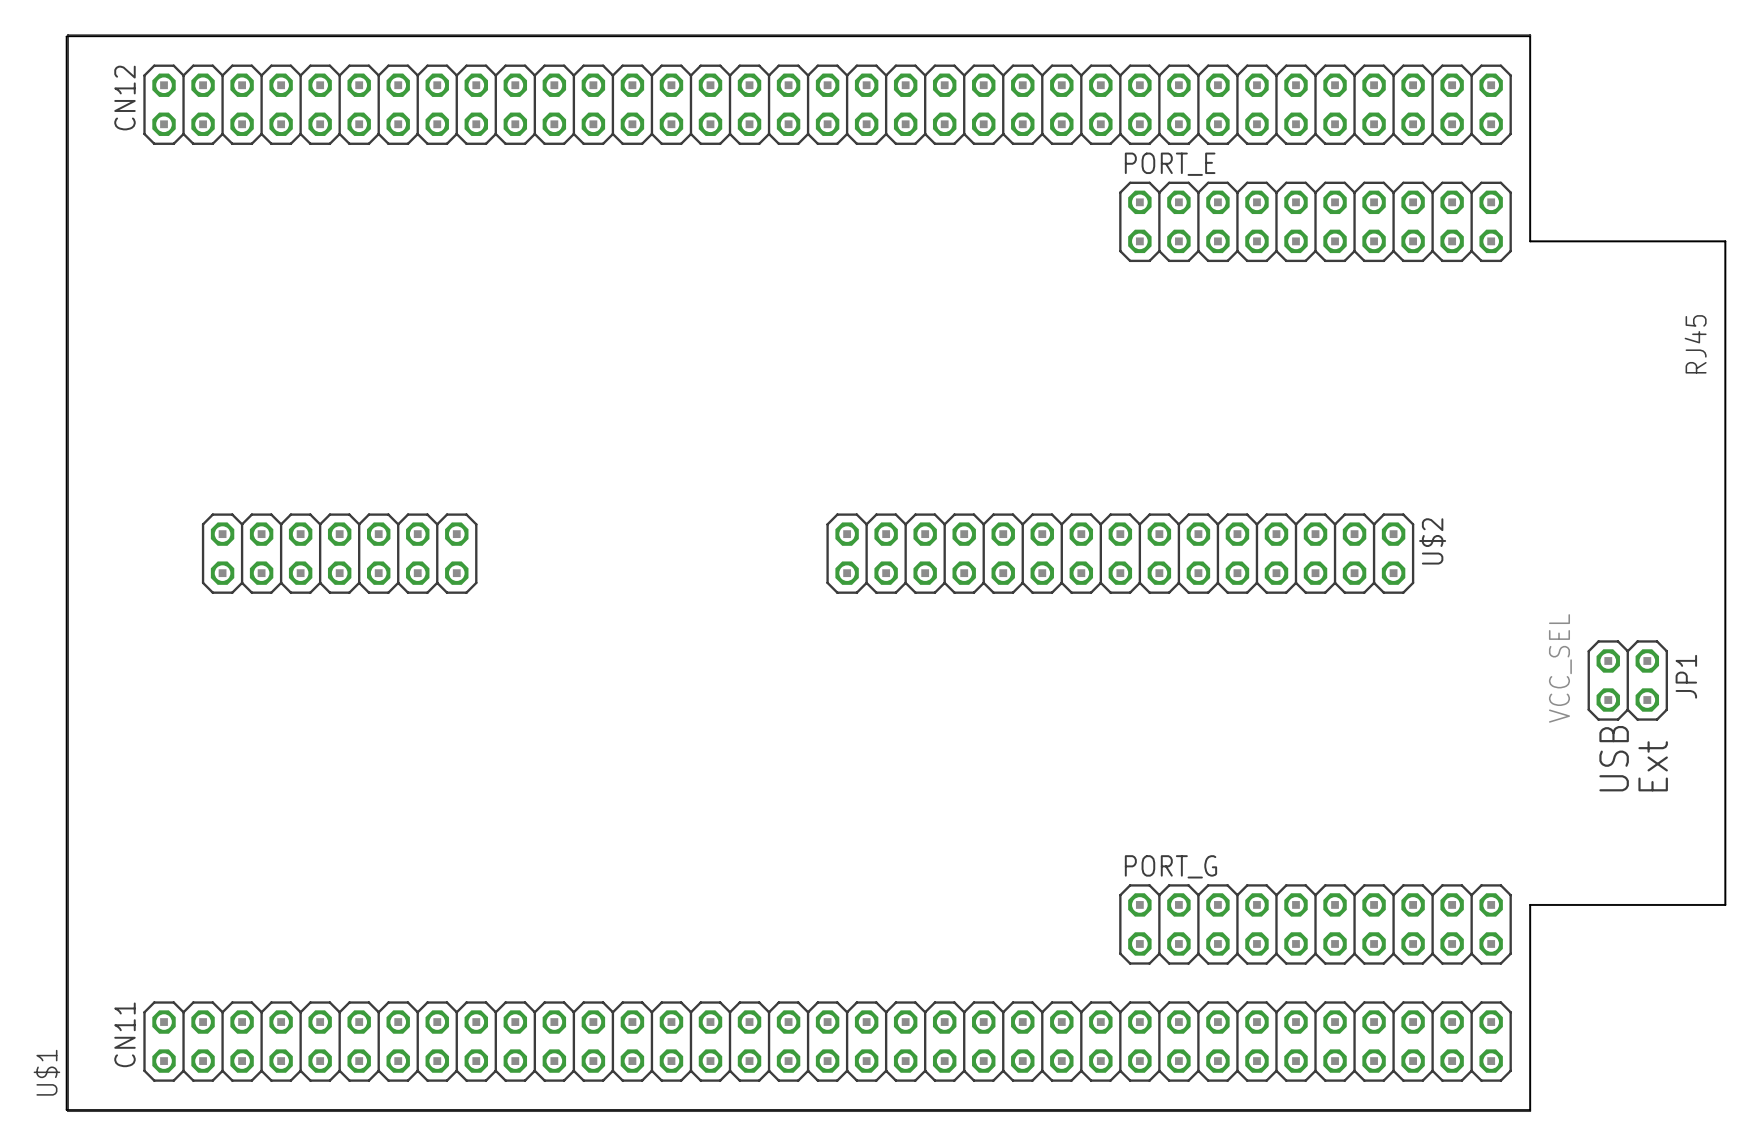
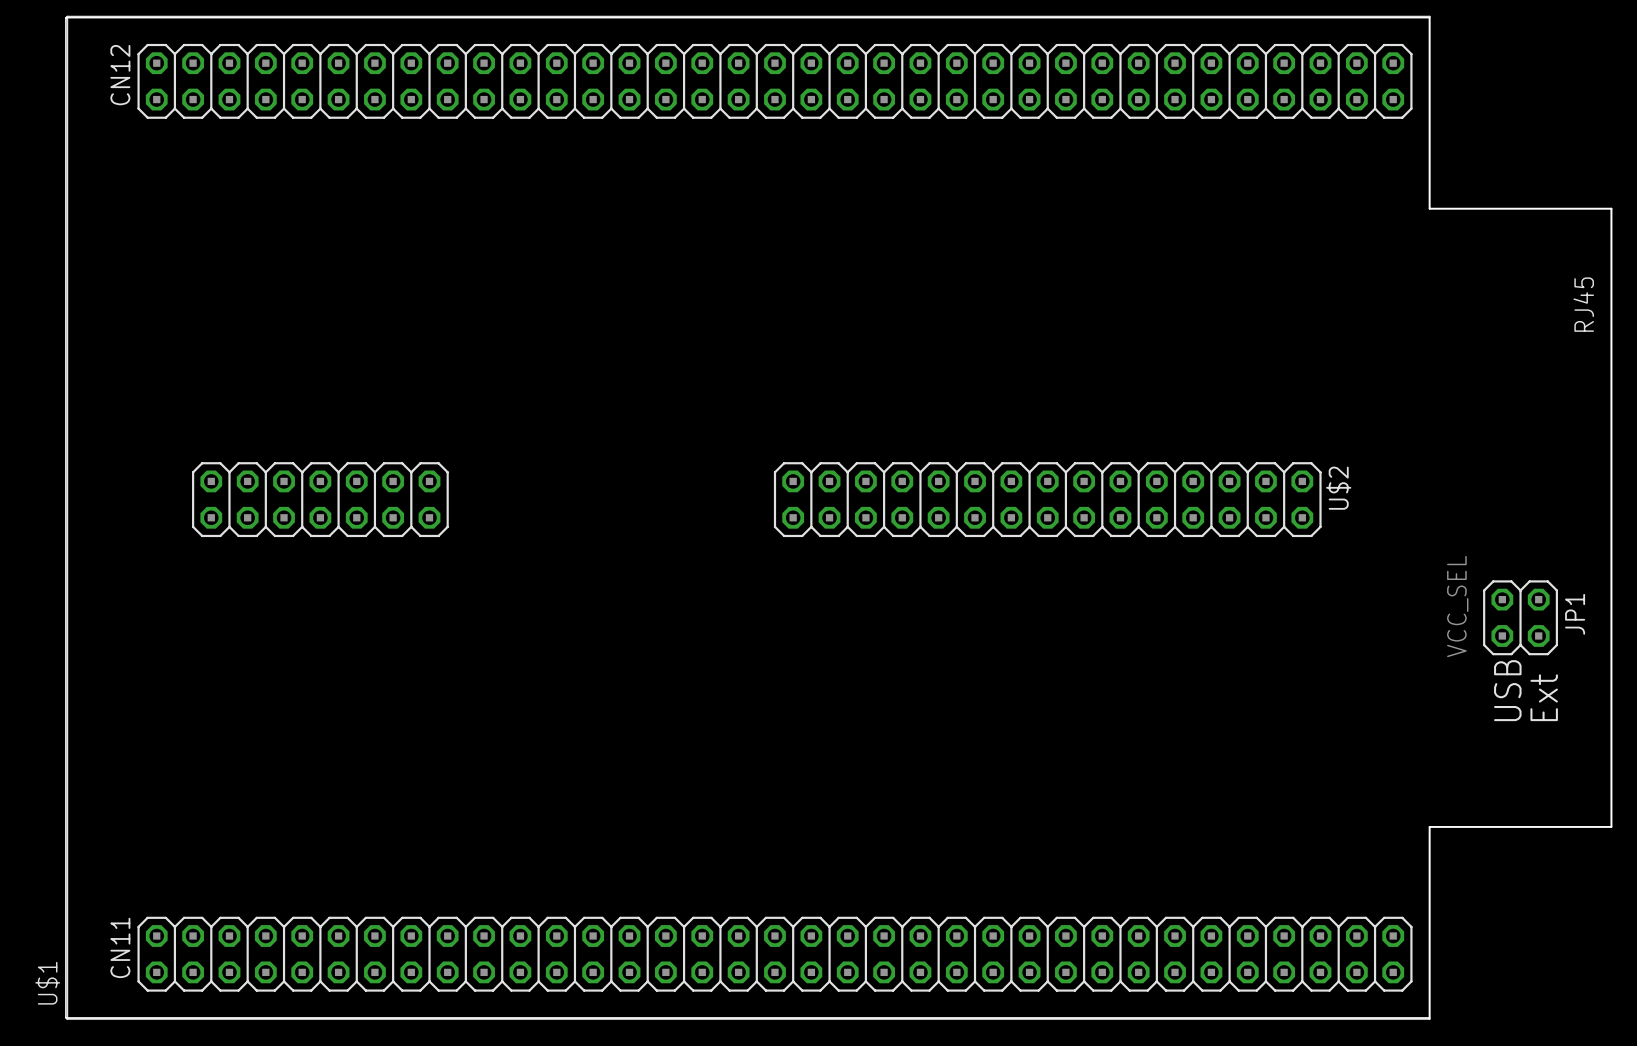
PORT_E: (1315, 221) -> none
PORT_G: (1315, 924) -> none

